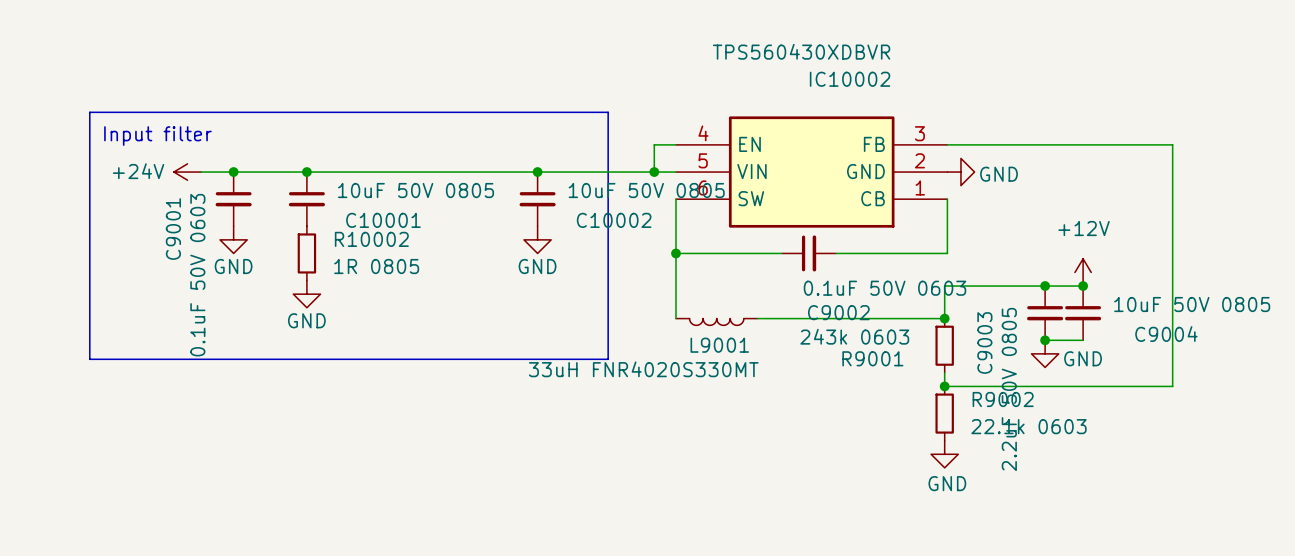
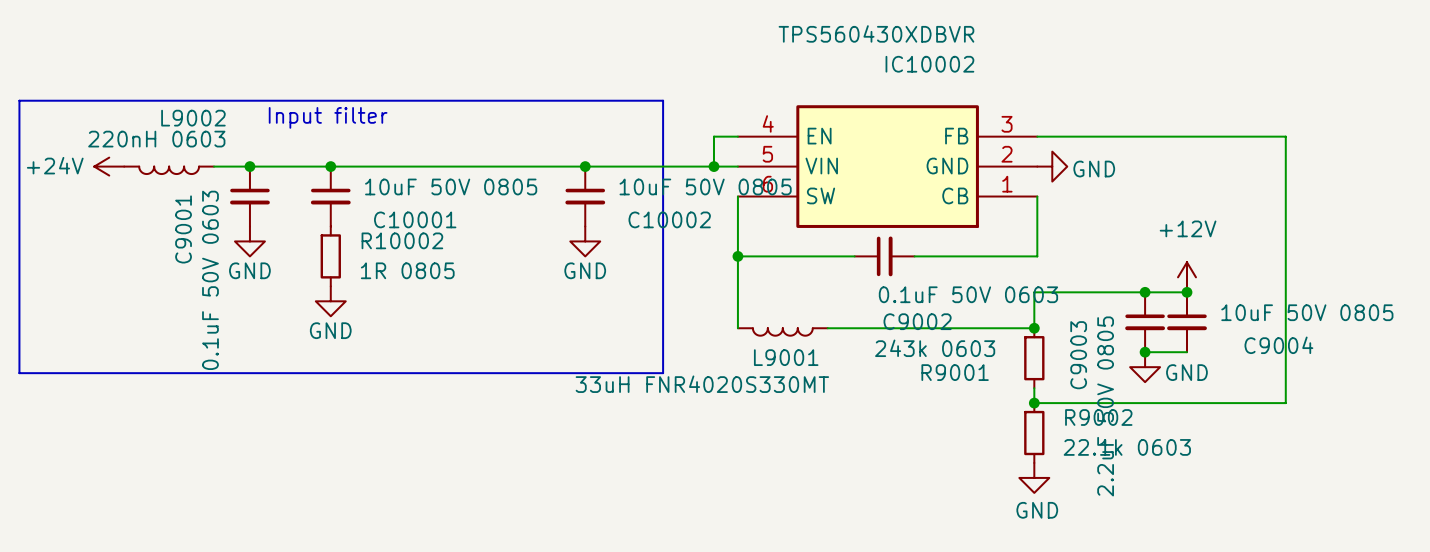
line: (89, 112) (89, 359) -> (91, 100) (19, 100) (19, 373) (91, 373)
text position: Input filter (157, 136) -> Input filter (328, 117)
power symbol position: +24V (187, 172) -> +24V (109, 166)
L9002: none -> 220nH 0603 (169, 170)

